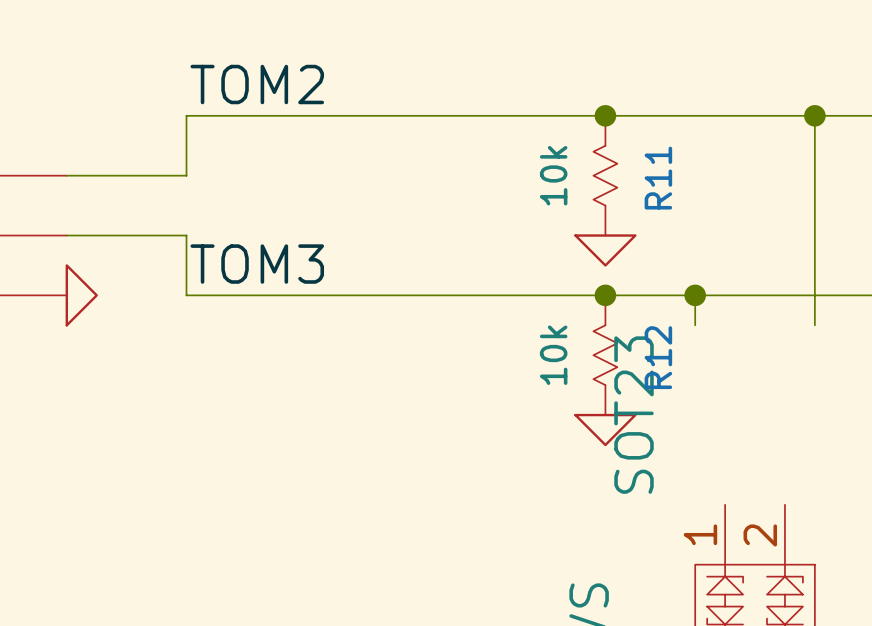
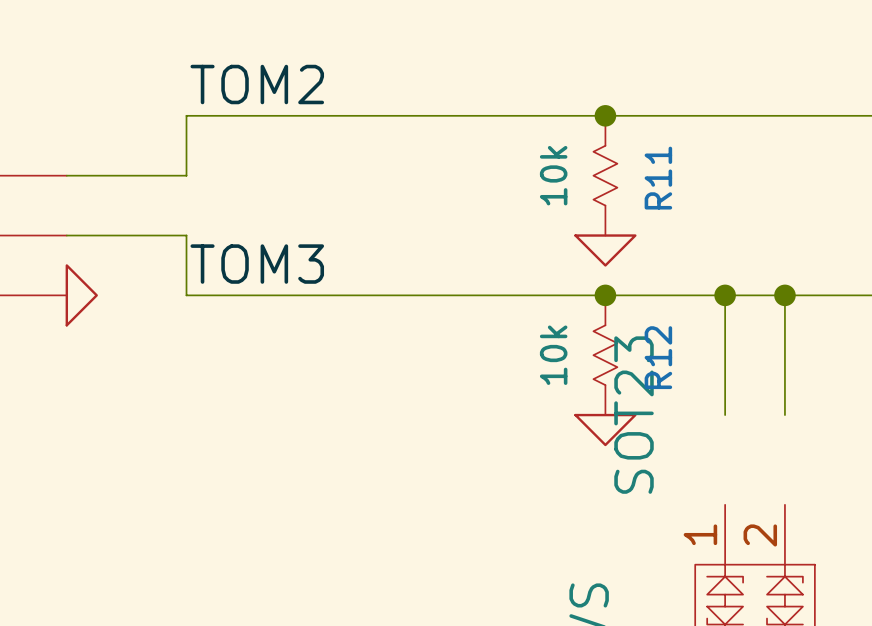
wire: (814, 115) (814, 325) -> none
junction: (814, 115) -> none
wire: (695, 295) (695, 325) -> none
junction position: (695, 295) -> (725, 295)
wire: none -> (725, 295) (725, 415)
wire: none -> (784, 295) (784, 415)
junction: none -> (784, 295)

